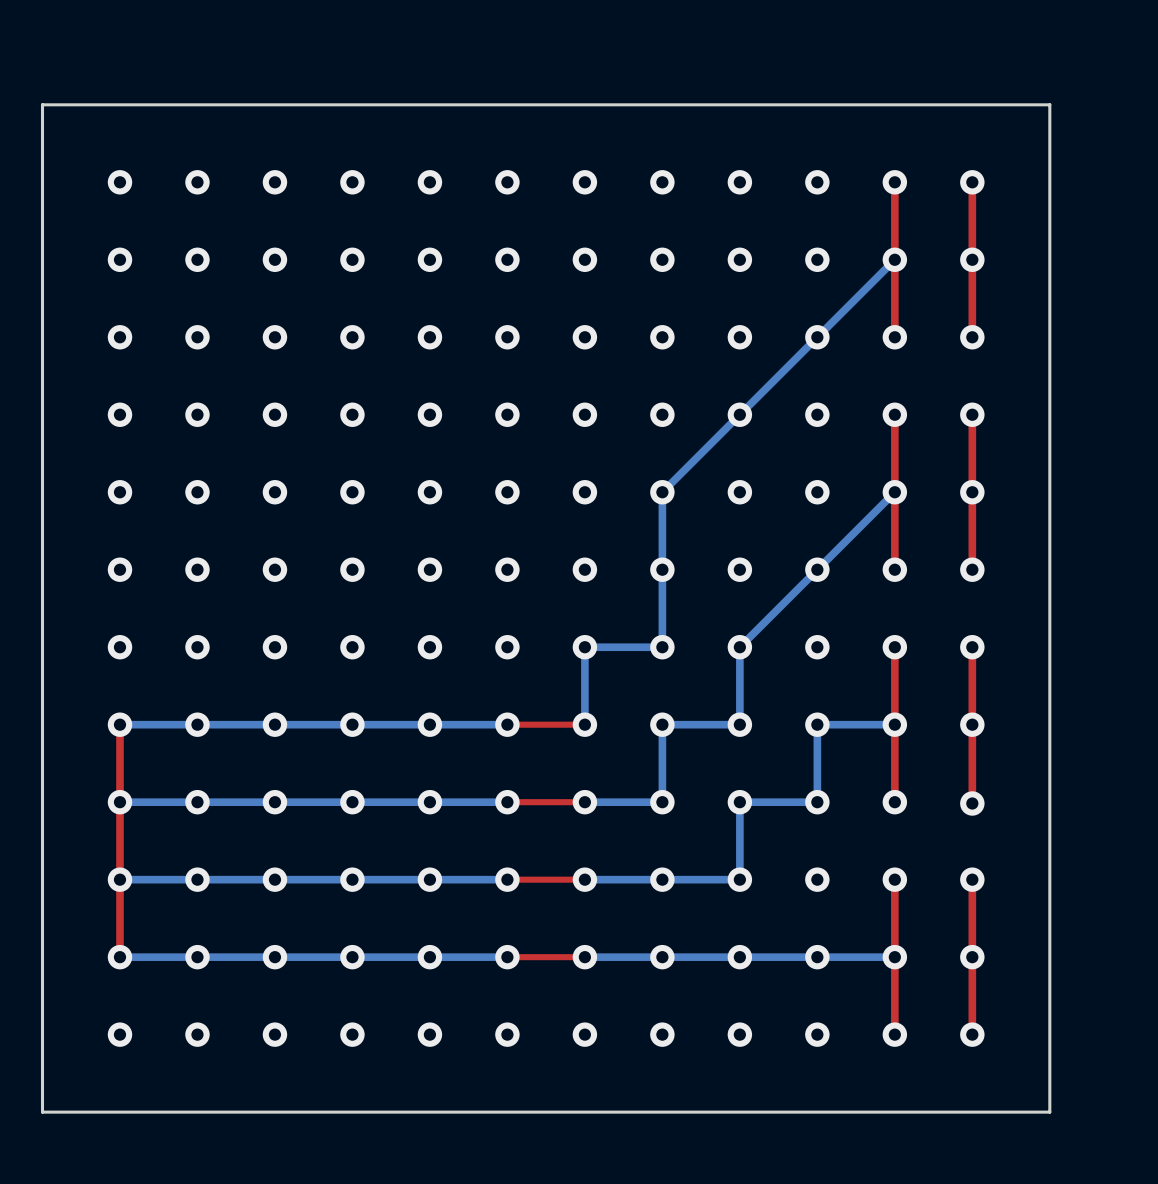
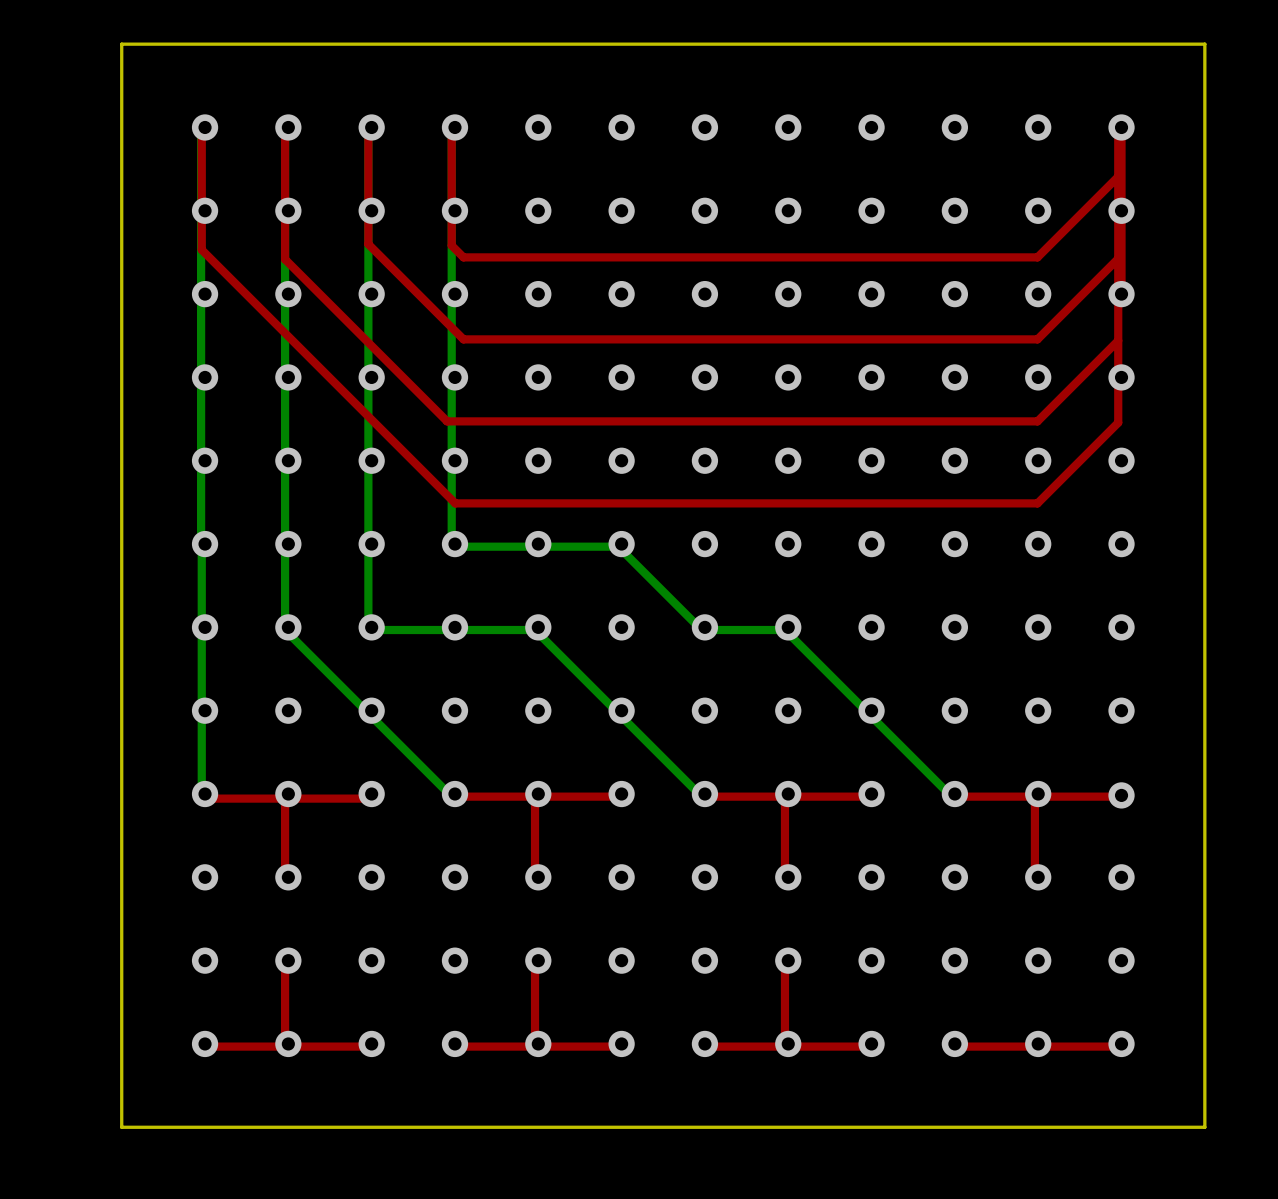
top track: (894, 182) (894, 337) -> none
top track: none -> (201, 130) (201, 249) (455, 503) (1037, 503) (1118, 422) (1118, 130)
top track: none -> (285, 130) (285, 259) (447, 421) (1037, 421) (1118, 340)
bottom track: none -> (285, 130) (285, 630) (451, 796)
top track: none -> (368, 130) (368, 244) (463, 339) (1037, 339) (1118, 258)
bottom track: none -> (368, 130) (368, 630) (535, 630) (701, 796)
top track: none -> (451, 130) (451, 245) (463, 257) (1037, 257) (1118, 176)
bottom track: none -> (451, 130) (451, 546) (618, 546) (701, 630) (784, 630) (951, 796)
bottom track: none -> (201, 131) (201, 547)
bottom track: (894, 259) (662, 492) (662, 647) (584, 647) (584, 724) -> none
top track: (894, 414) (894, 569) -> none
top track: (972, 414) (972, 569) -> none
bottom track: (894, 492) (739, 647) (739, 724) (662, 724) (662, 802) (584, 802) -> none
bottom track: none -> (201, 546) (201, 796)
top track: (894, 647) (894, 802) -> none
top track: (972, 647) (972, 803) -> none
top track: (119, 724) (119, 957) -> none
bottom track: (119, 724) (507, 724) -> none
top track: (507, 724) (584, 724) -> none
bottom track: (894, 724) (817, 724) (817, 802) (739, 802) (739, 879) (584, 879) -> none
bottom track: (119, 802) (507, 802) -> none
top track: (507, 802) (584, 802) -> none
top track: none -> (285, 796) (285, 879)
top track: none -> (451, 796) (618, 796)
top track: none -> (535, 796) (535, 879)
top track: none -> (701, 796) (868, 796)
top track: none -> (784, 796) (784, 879)
top track: none -> (951, 796) (1118, 796)
top track: none -> (1034, 796) (1034, 879)
top track: none -> (199, 798) (366, 798)
bottom track: (119, 879) (507, 879) -> none
top track: (507, 879) (584, 879) -> none
top track: (894, 879) (894, 1034) -> none
top track: (972, 879) (972, 1034) -> none
bottom track: (119, 957) (507, 957) -> none
top track: (507, 957) (584, 957) -> none
bottom track: (584, 957) (894, 957) -> none
top track: none -> (285, 963) (285, 1046)
top track: none -> (535, 963) (535, 1046)
top track: none -> (784, 963) (784, 1046)
top track: none -> (201, 1046) (368, 1046)
top track: none -> (450, 1046) (618, 1046)
top track: none -> (701, 1046) (868, 1046)
top track: none -> (951, 1046) (1118, 1046)

